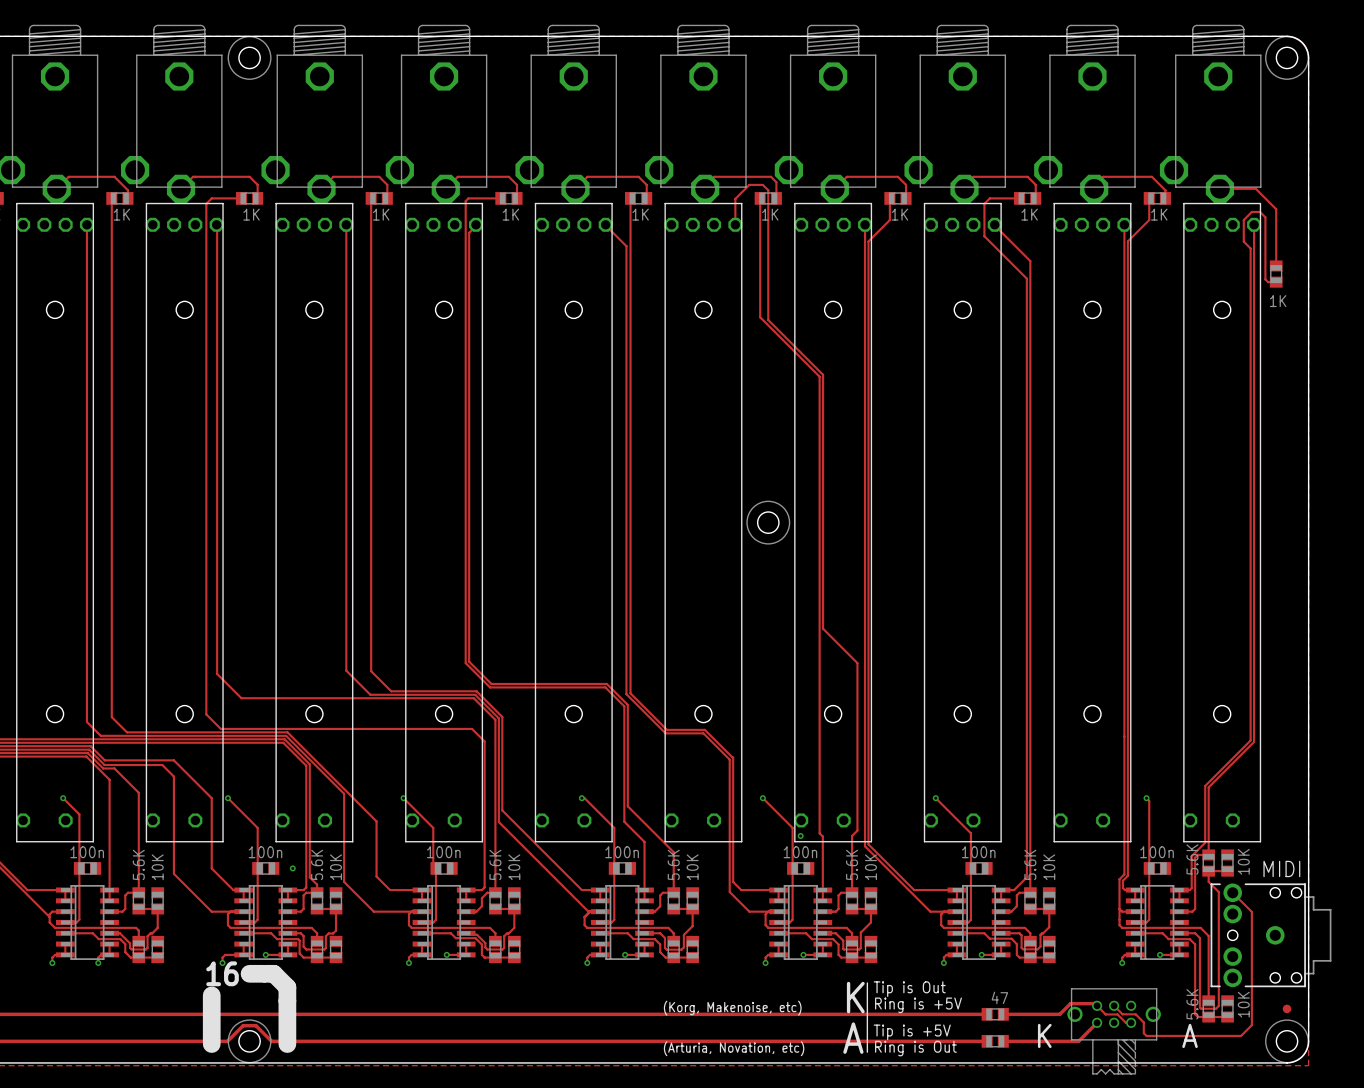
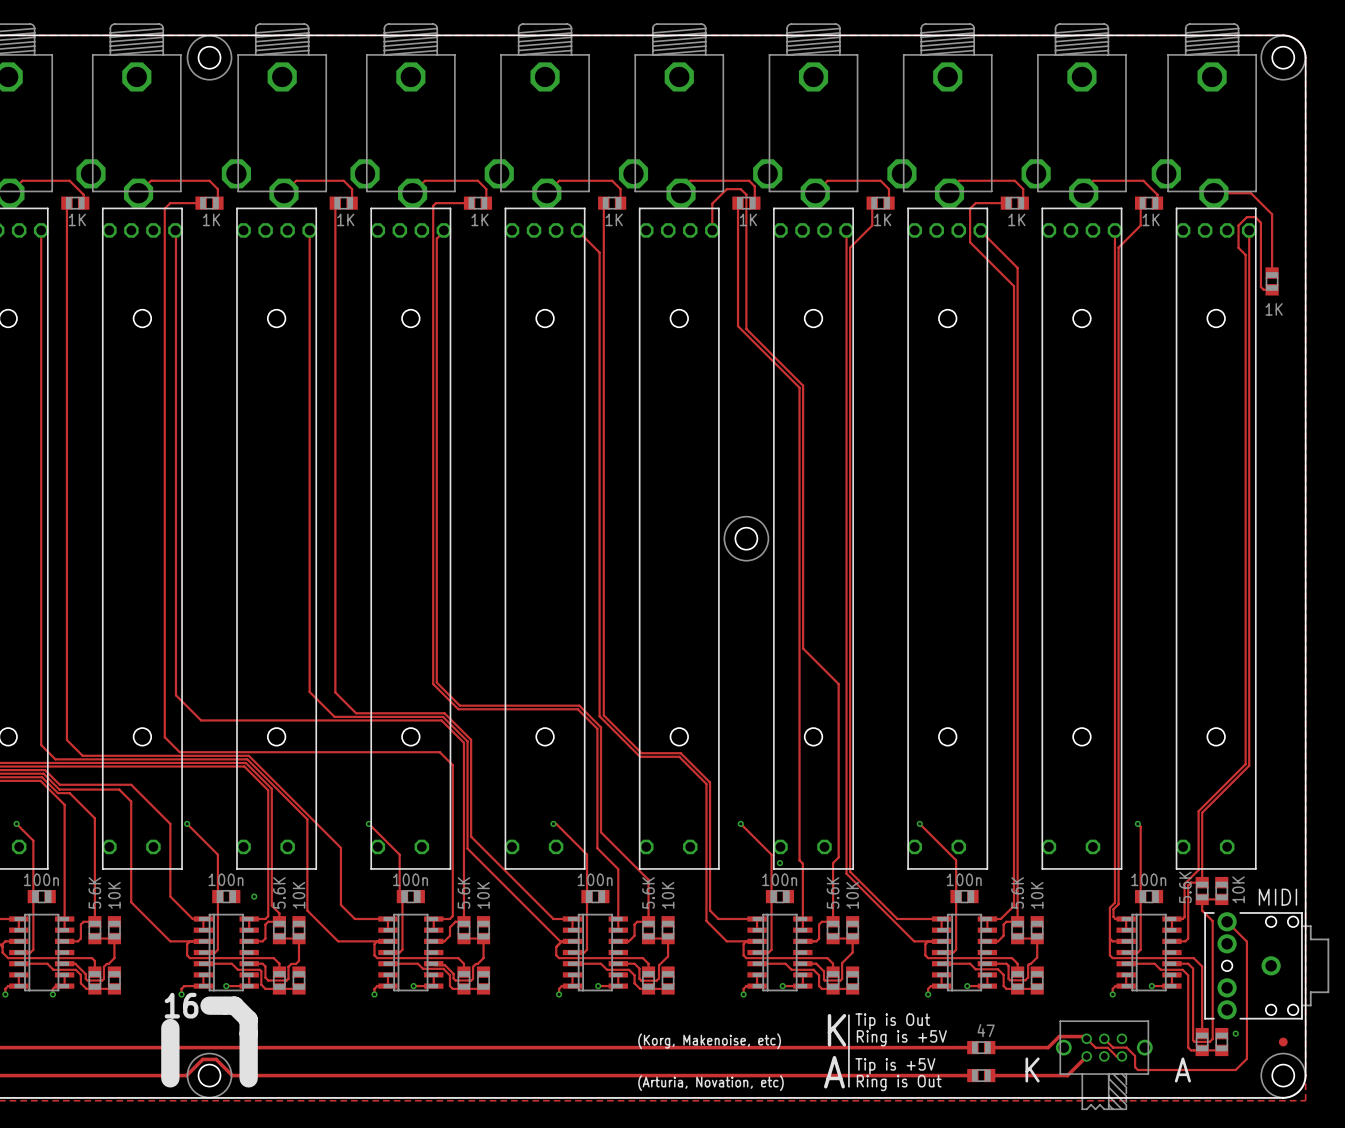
via: none -> (1235, 1033)
part value: 5.6K (1192, 1004) -> none
part value: 10K (1243, 1004) -> none

